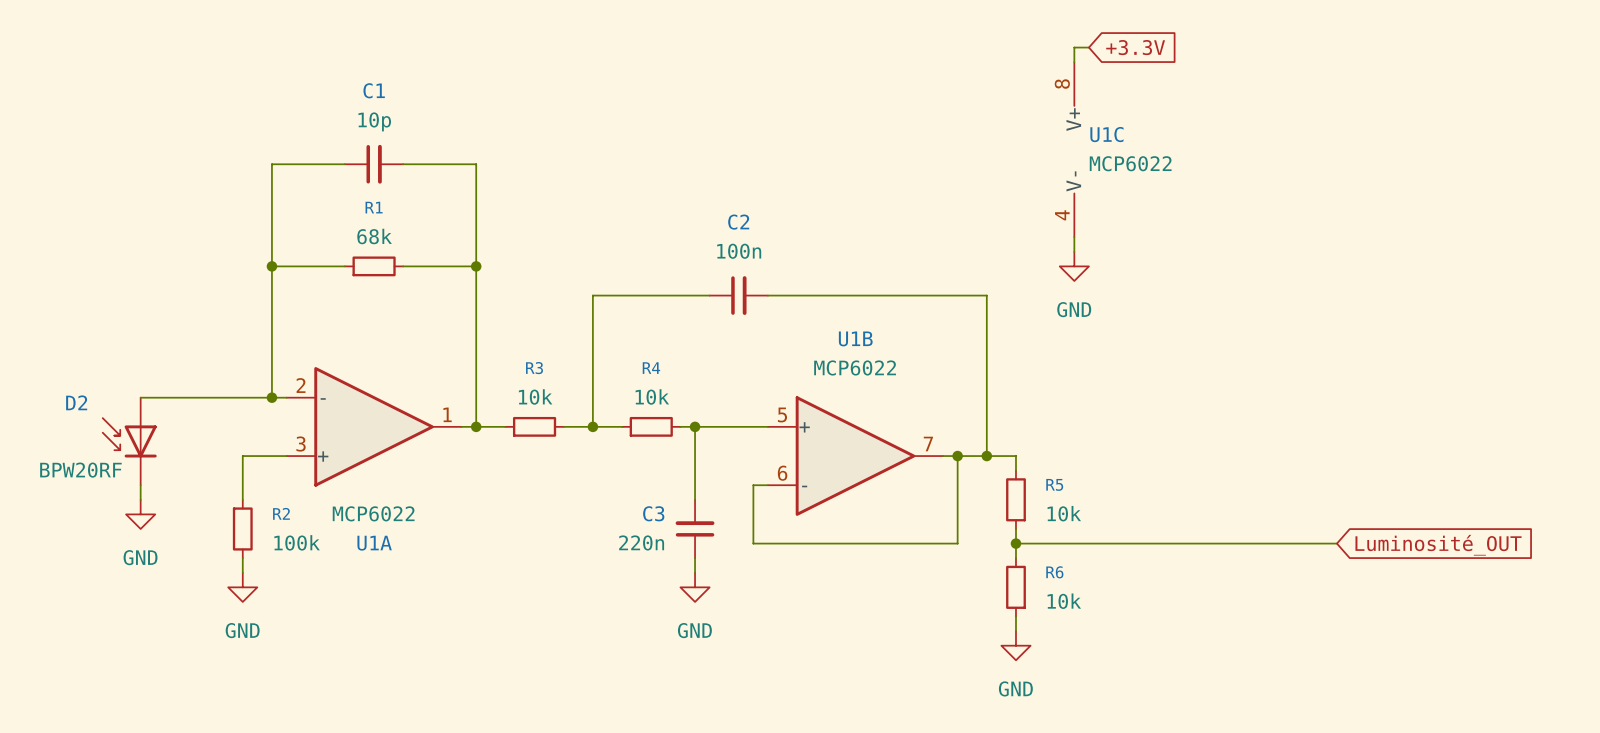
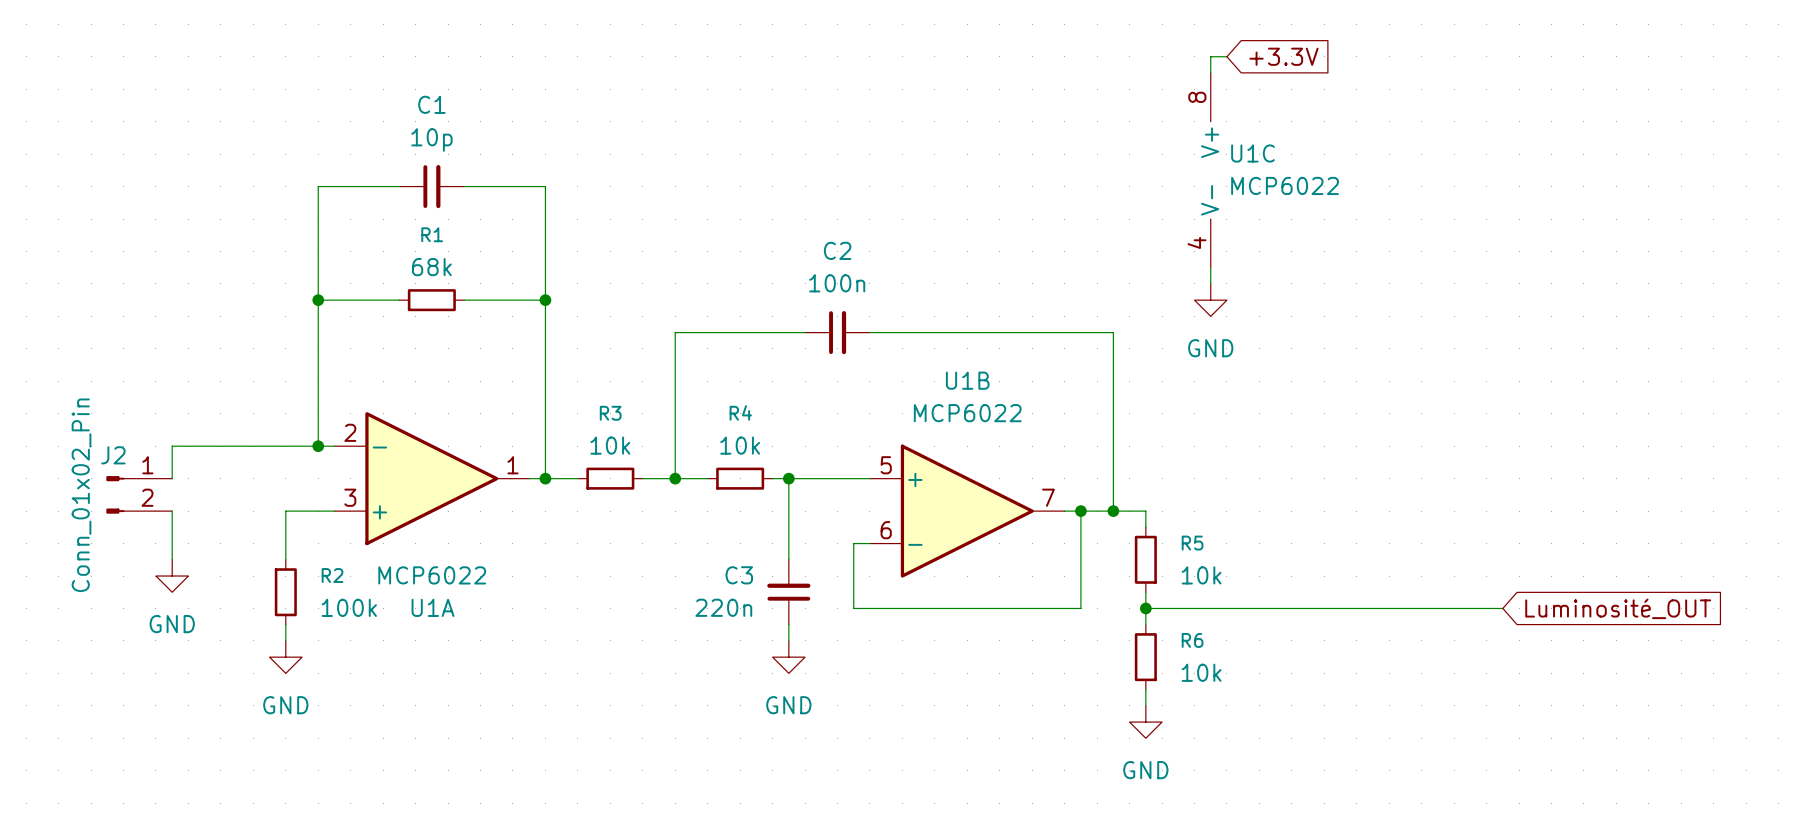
J2: none -> Conn_01x02_Pin (139, 494)
D2: BPW20RF (129, 441) -> none

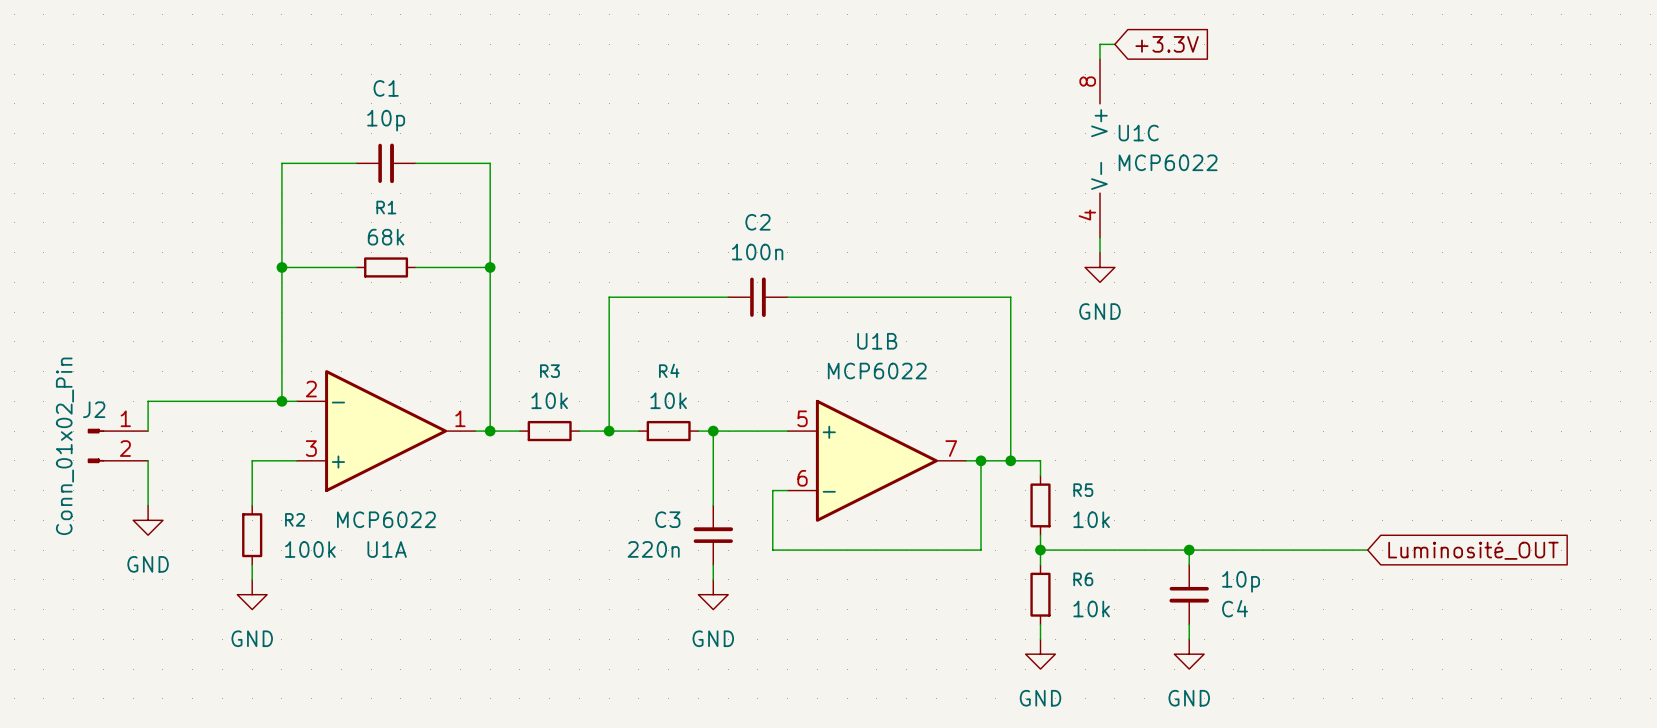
wire: none -> (1189, 550) (1189, 564)
junction: none -> (1189, 550)
C4: none -> 10p (1189, 594)
wire: none -> (1189, 624) (1189, 639)
power symbol: none -> GND (1189, 654)

